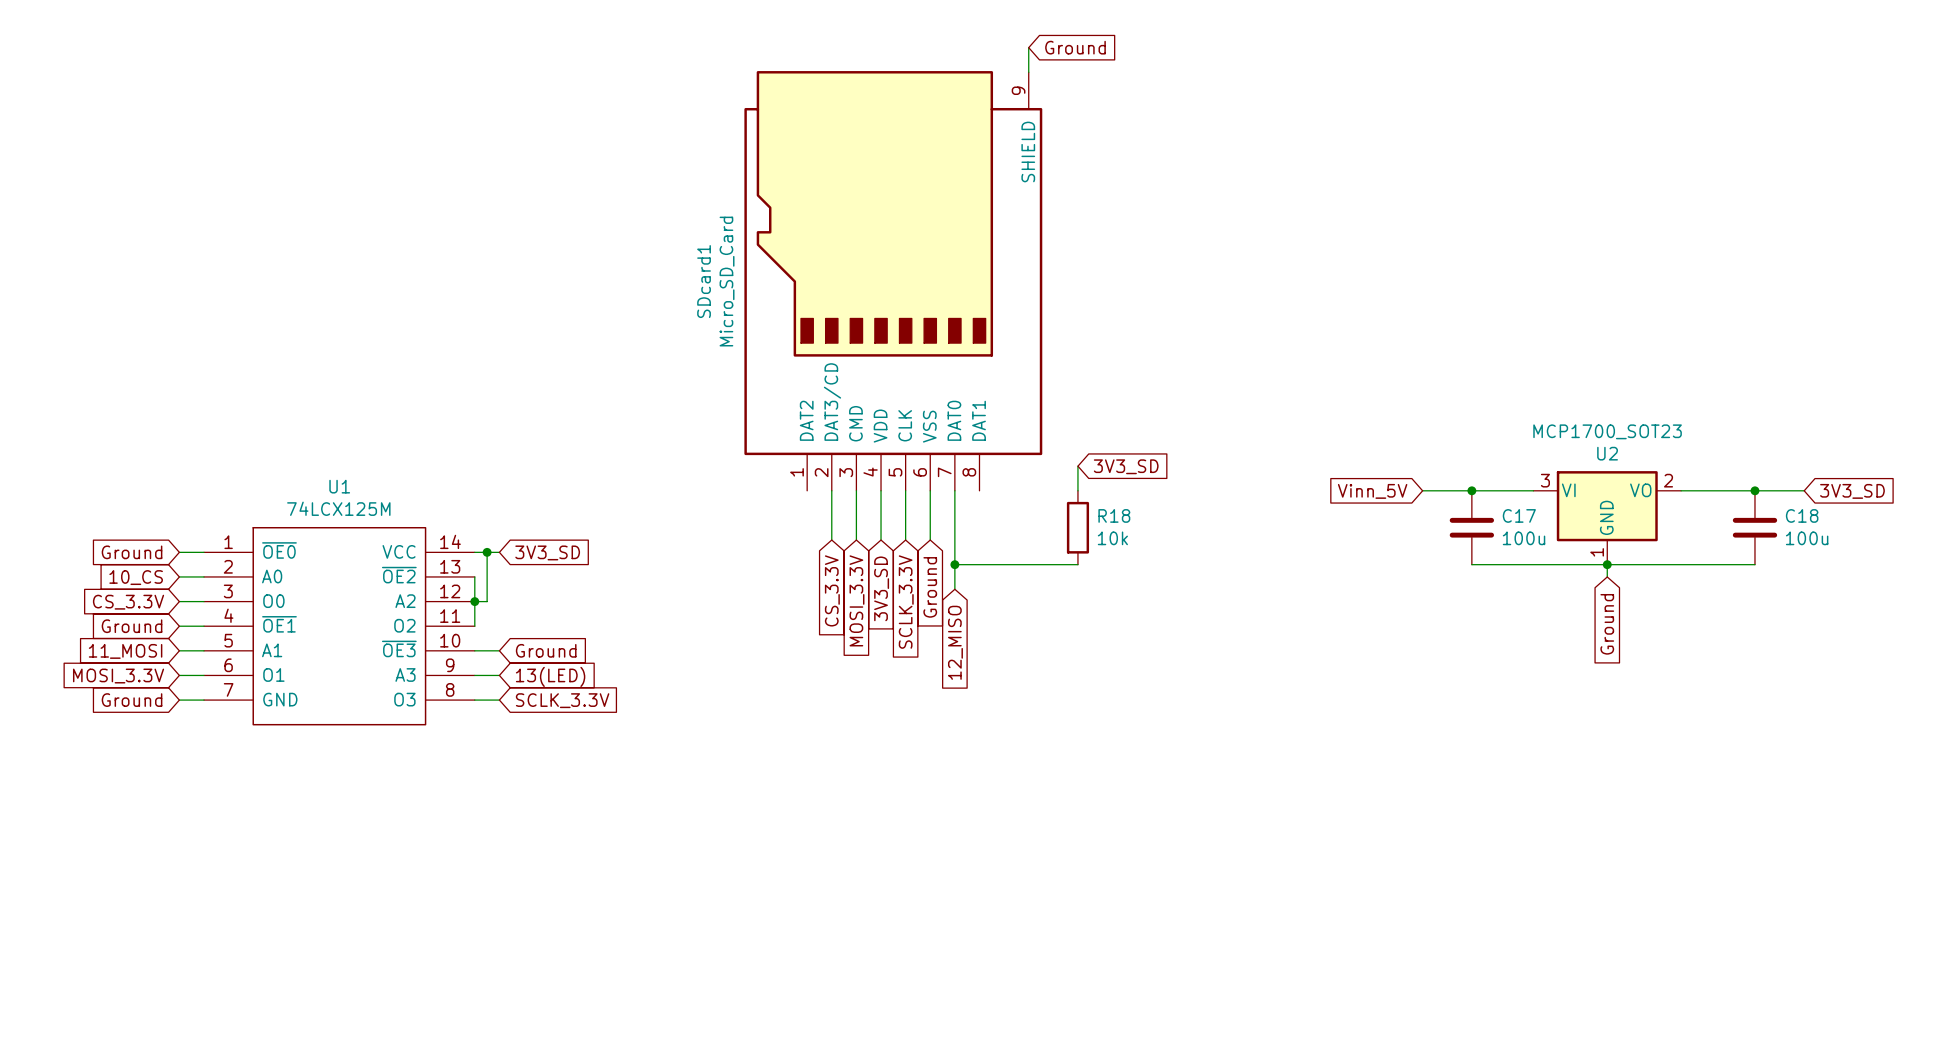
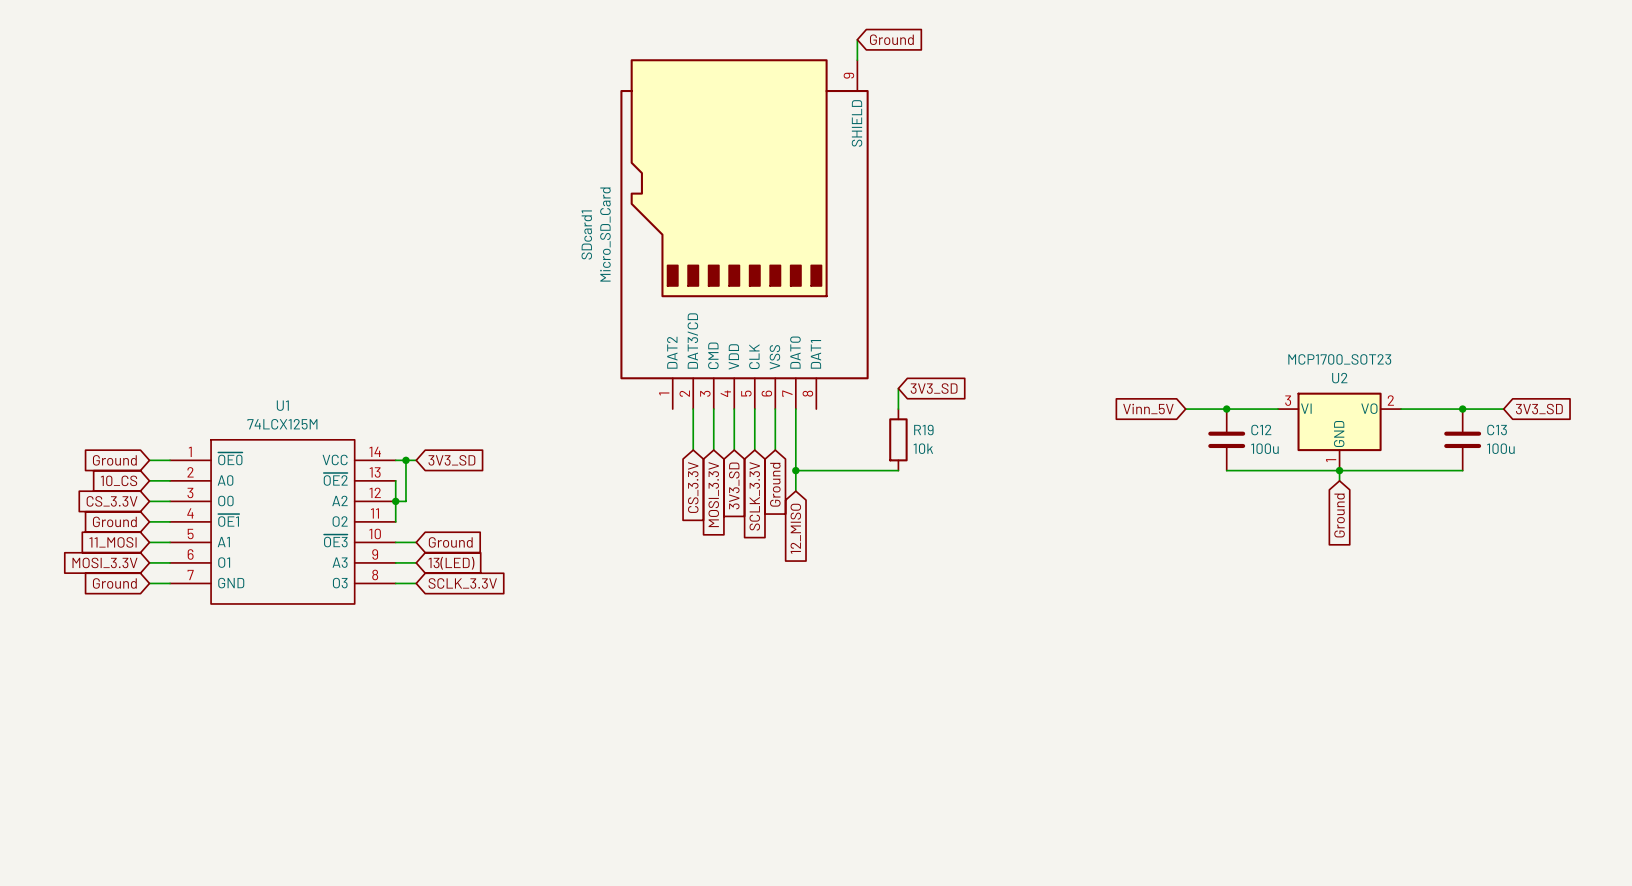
R18 name: R18 (1114, 515) -> R19 (923, 430)
C17 name: C17 (1519, 515) -> C12 (1261, 430)
C18 name: C18 (1802, 515) -> C13 (1497, 430)

